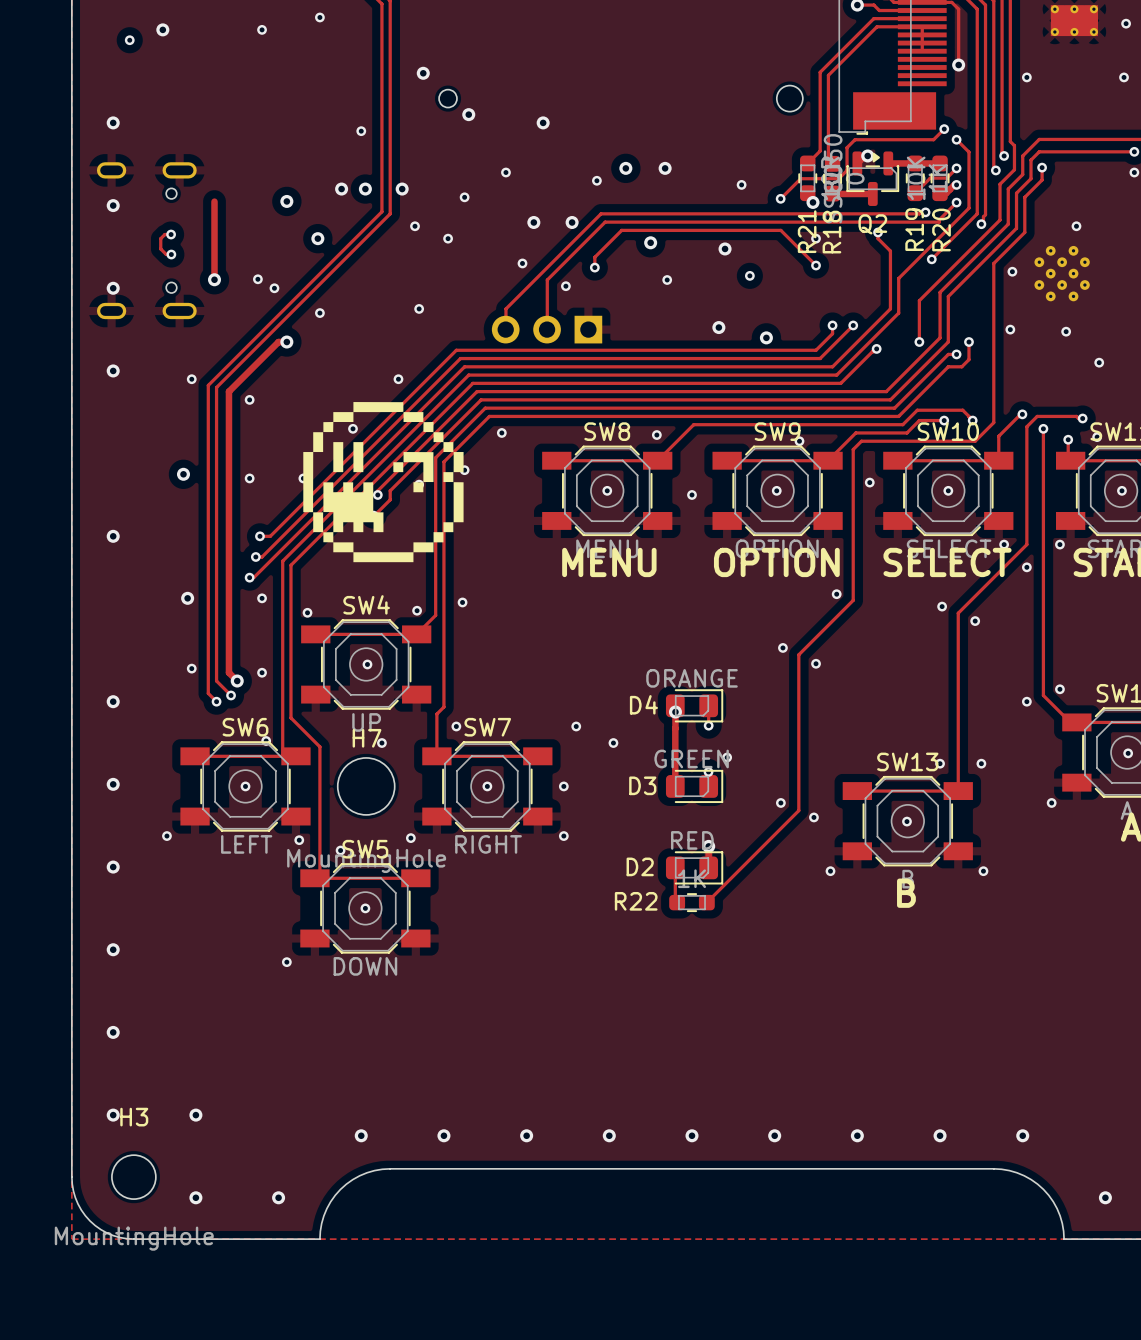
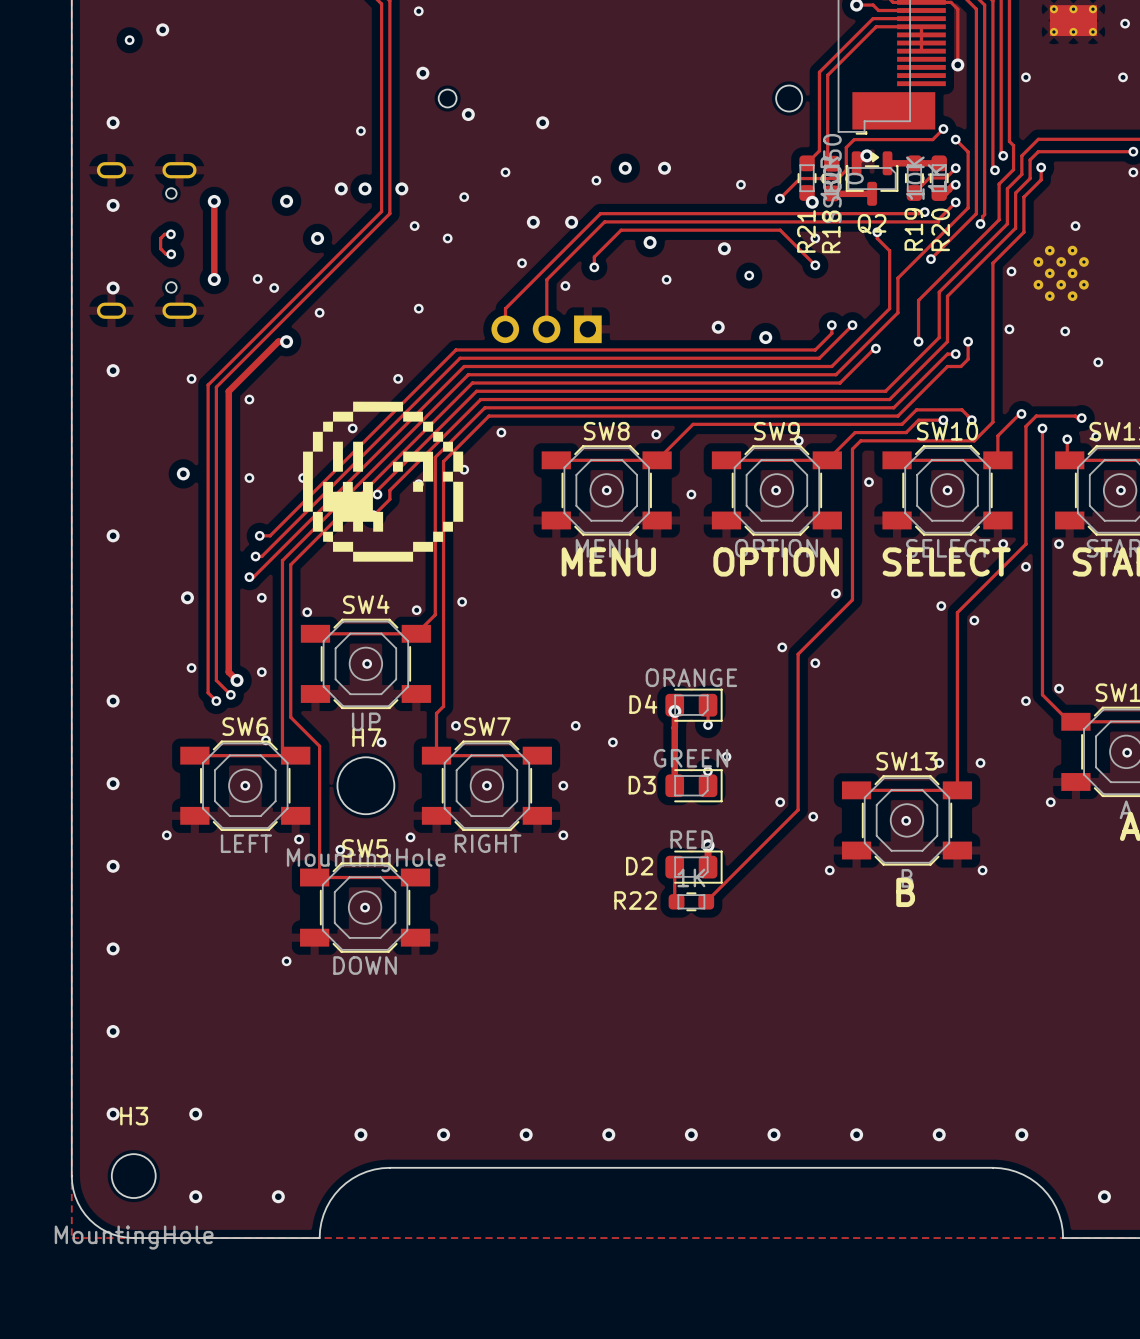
via: none -> (418, 11)
via: (319, 17) -> none
via: (262, 29) -> none
via: none -> (214, 201)

